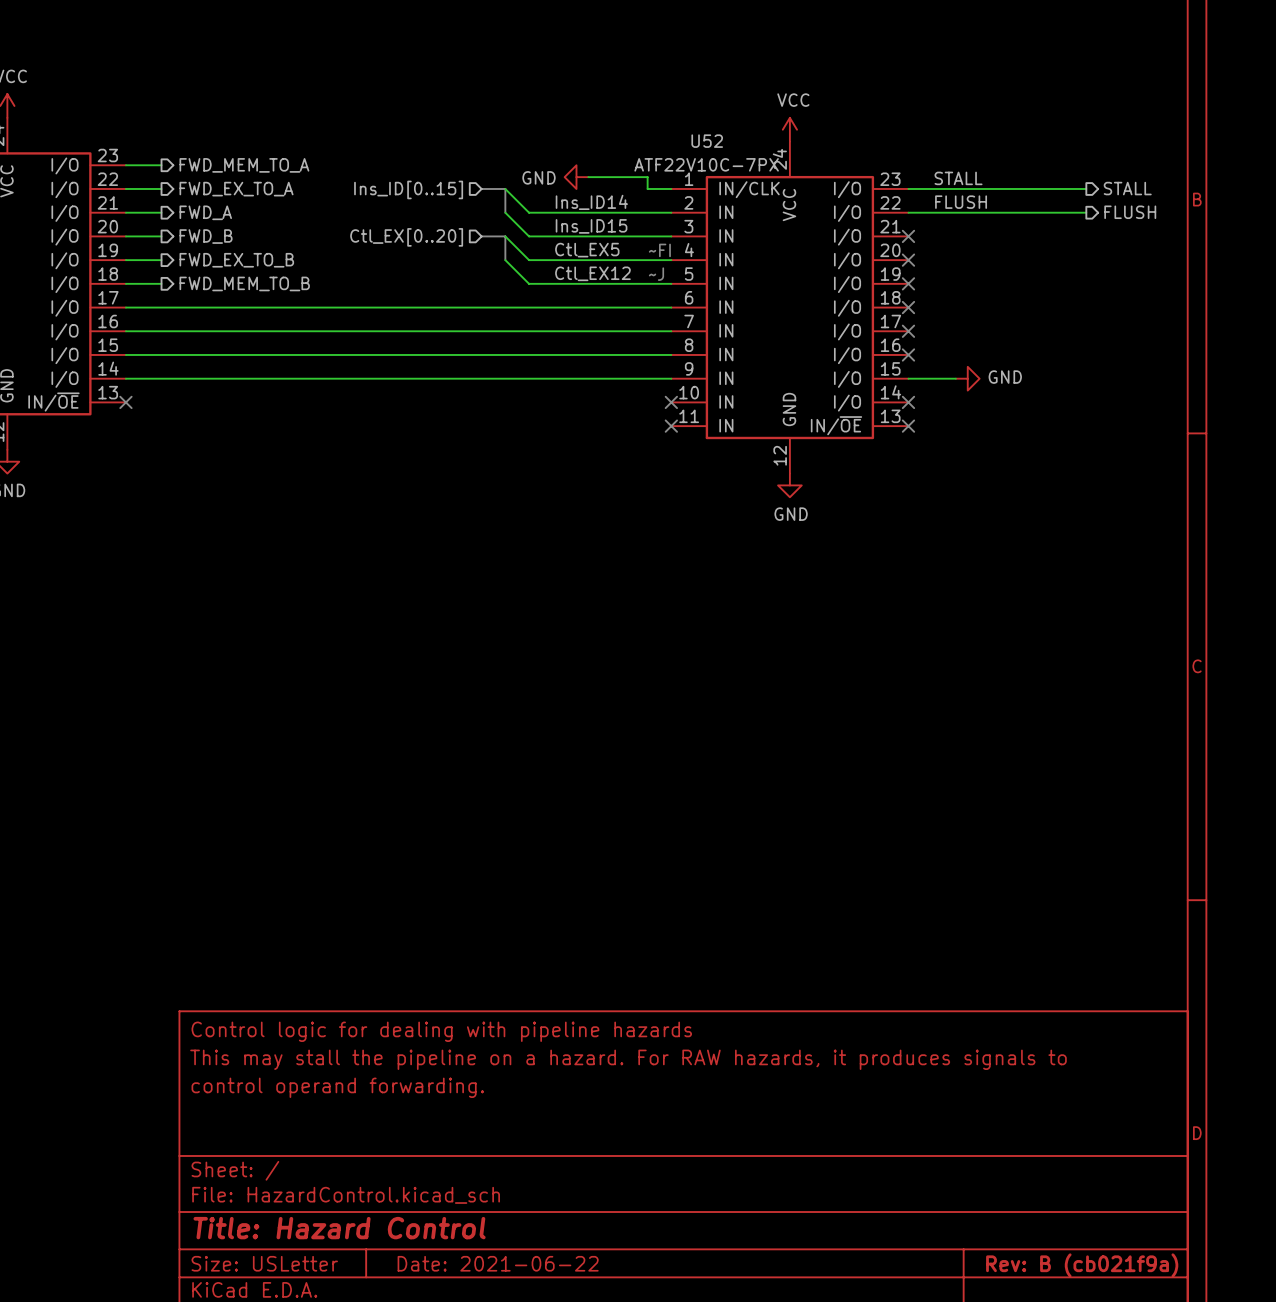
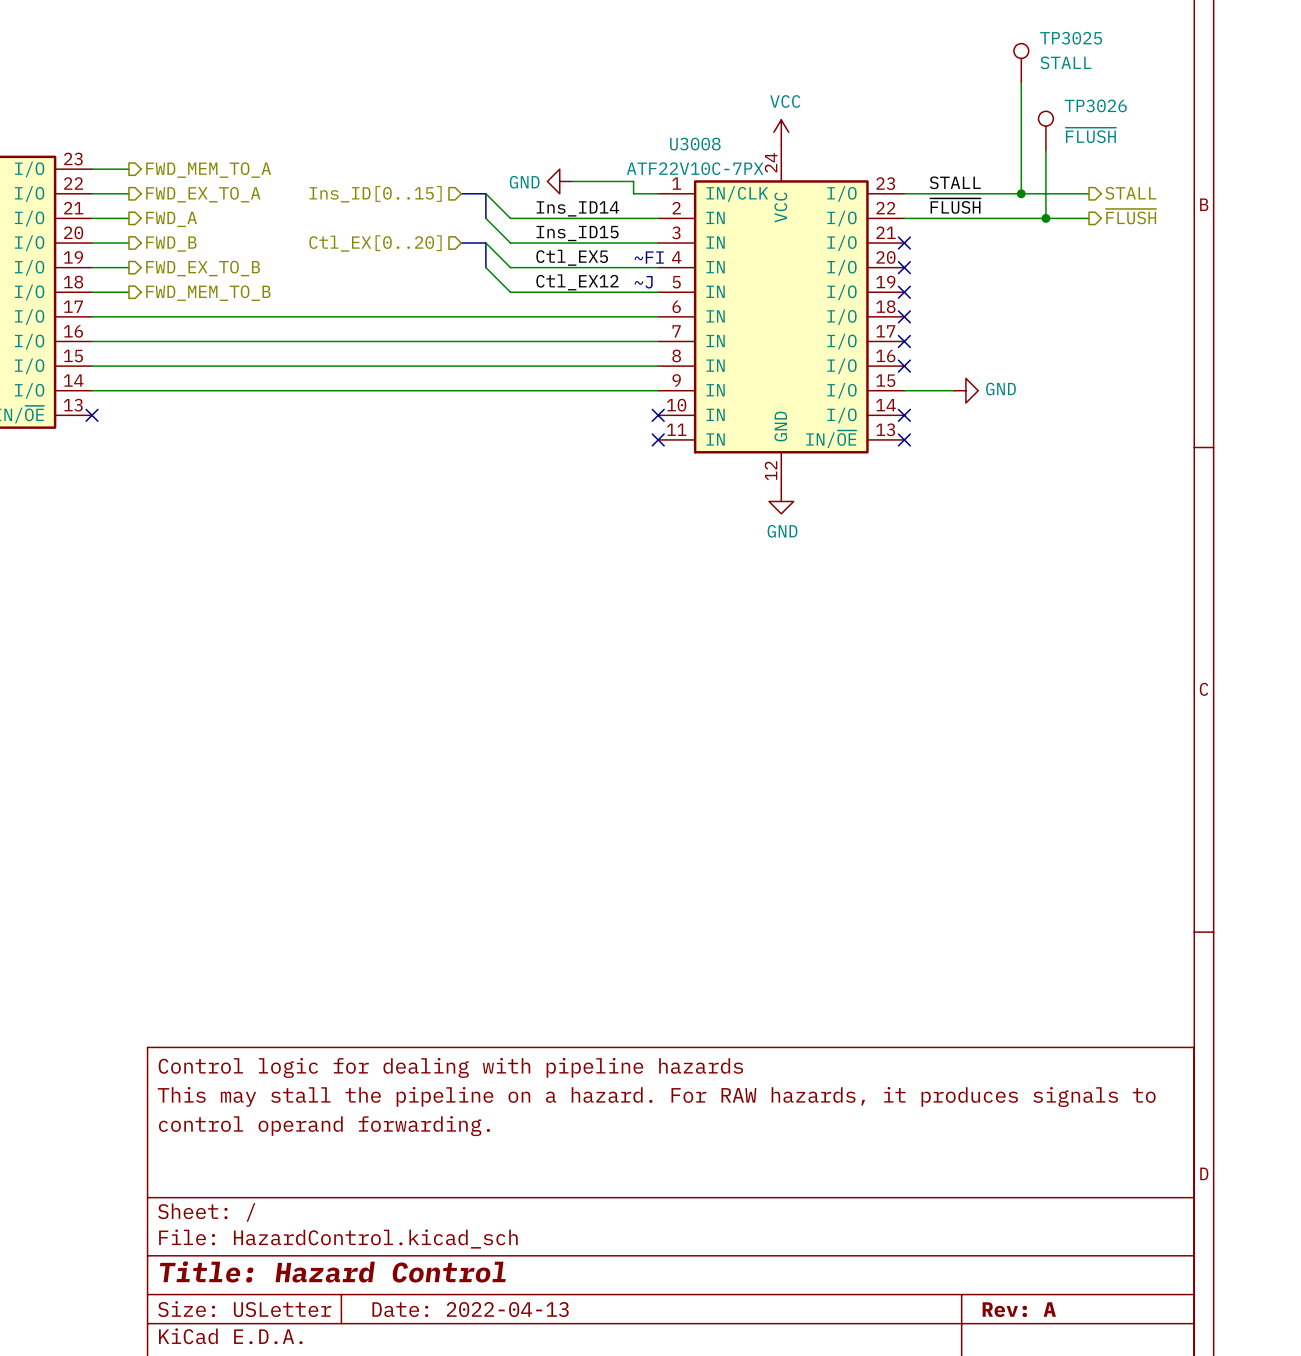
TP3025: none -> STALL (1021, 63)
wire: none -> (1021, 83) (1021, 193)
TP3026: none -> ~{FLUSH} (1045, 131)
U52 name: U52 (707, 141) -> U3008 (695, 144)
wire: none -> (1045, 150) (1045, 218)
junction: none -> (1021, 193)
label: FLUSH (961, 202) -> ~{FLUSH} (955, 206)
junction: none -> (1045, 218)
hierarchical label: FLUSH (1130, 212) -> ~{FLUSH} (1131, 216)
title block: Date: 2021-06-22 (498, 1263) -> Date: 2022-04-13 (470, 1309)
title block: Rev: B (cb021f9a) (1082, 1265) -> Rev: A (1019, 1309)

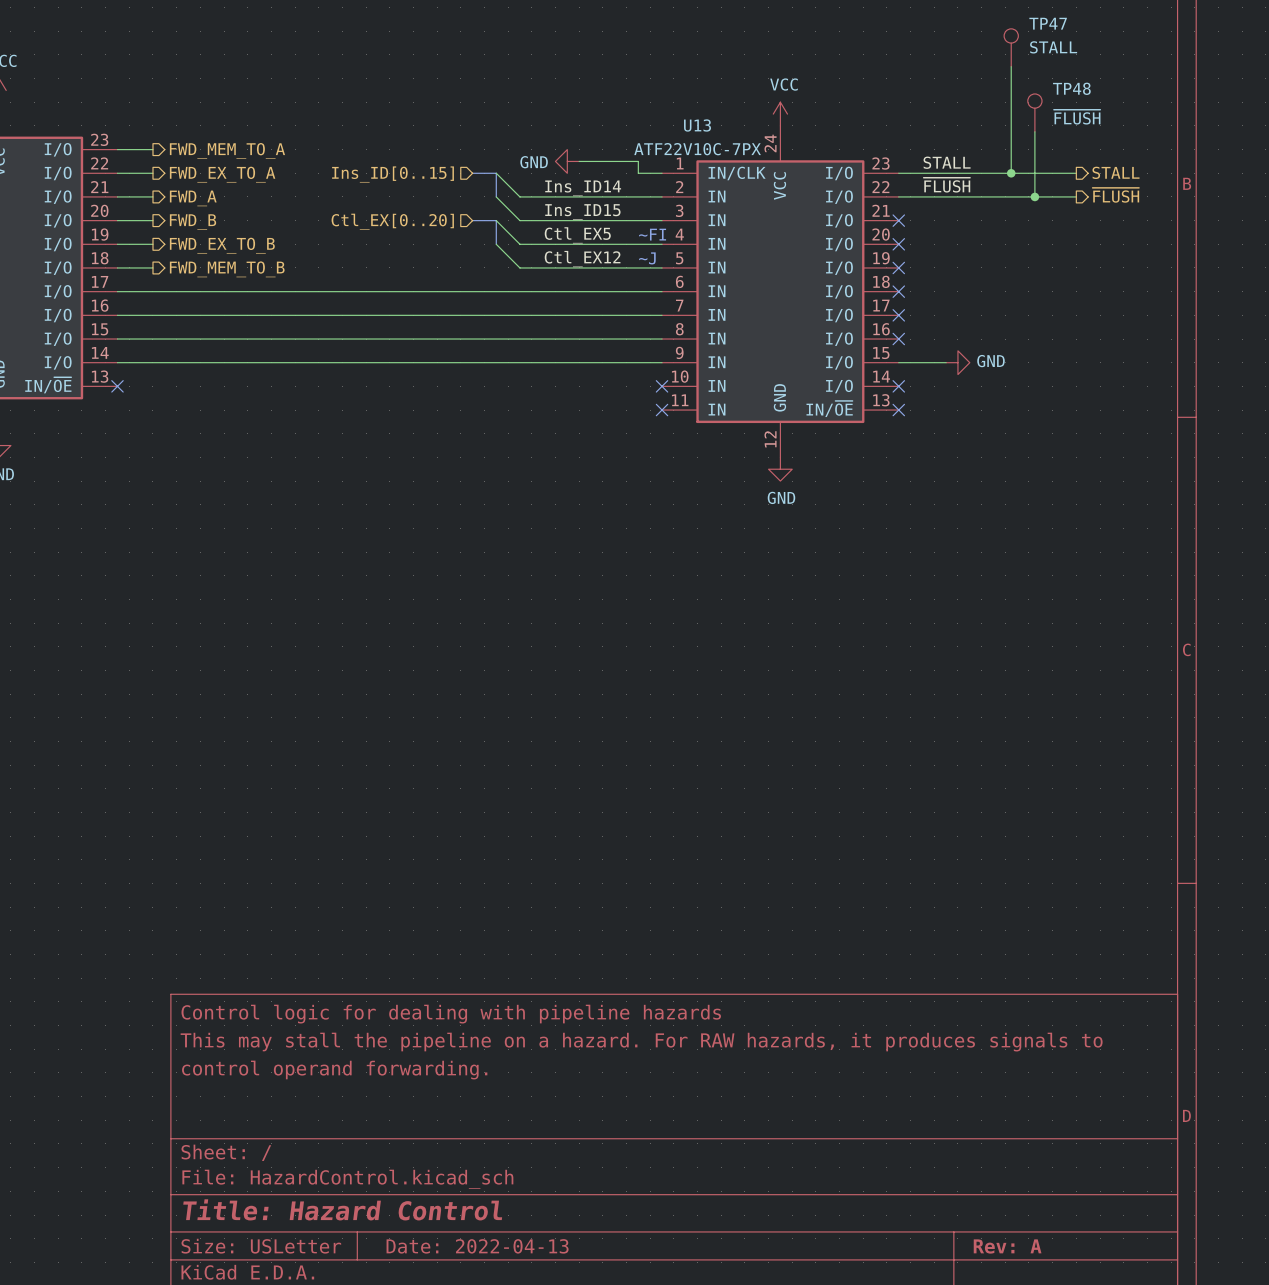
TP3025 name: TP3025 (1071, 38) -> TP47 (1048, 23)
TP3026 name: TP3026 (1095, 105) -> TP48 (1071, 88)
U3008 name: U3008 (695, 144) -> U13 (697, 125)

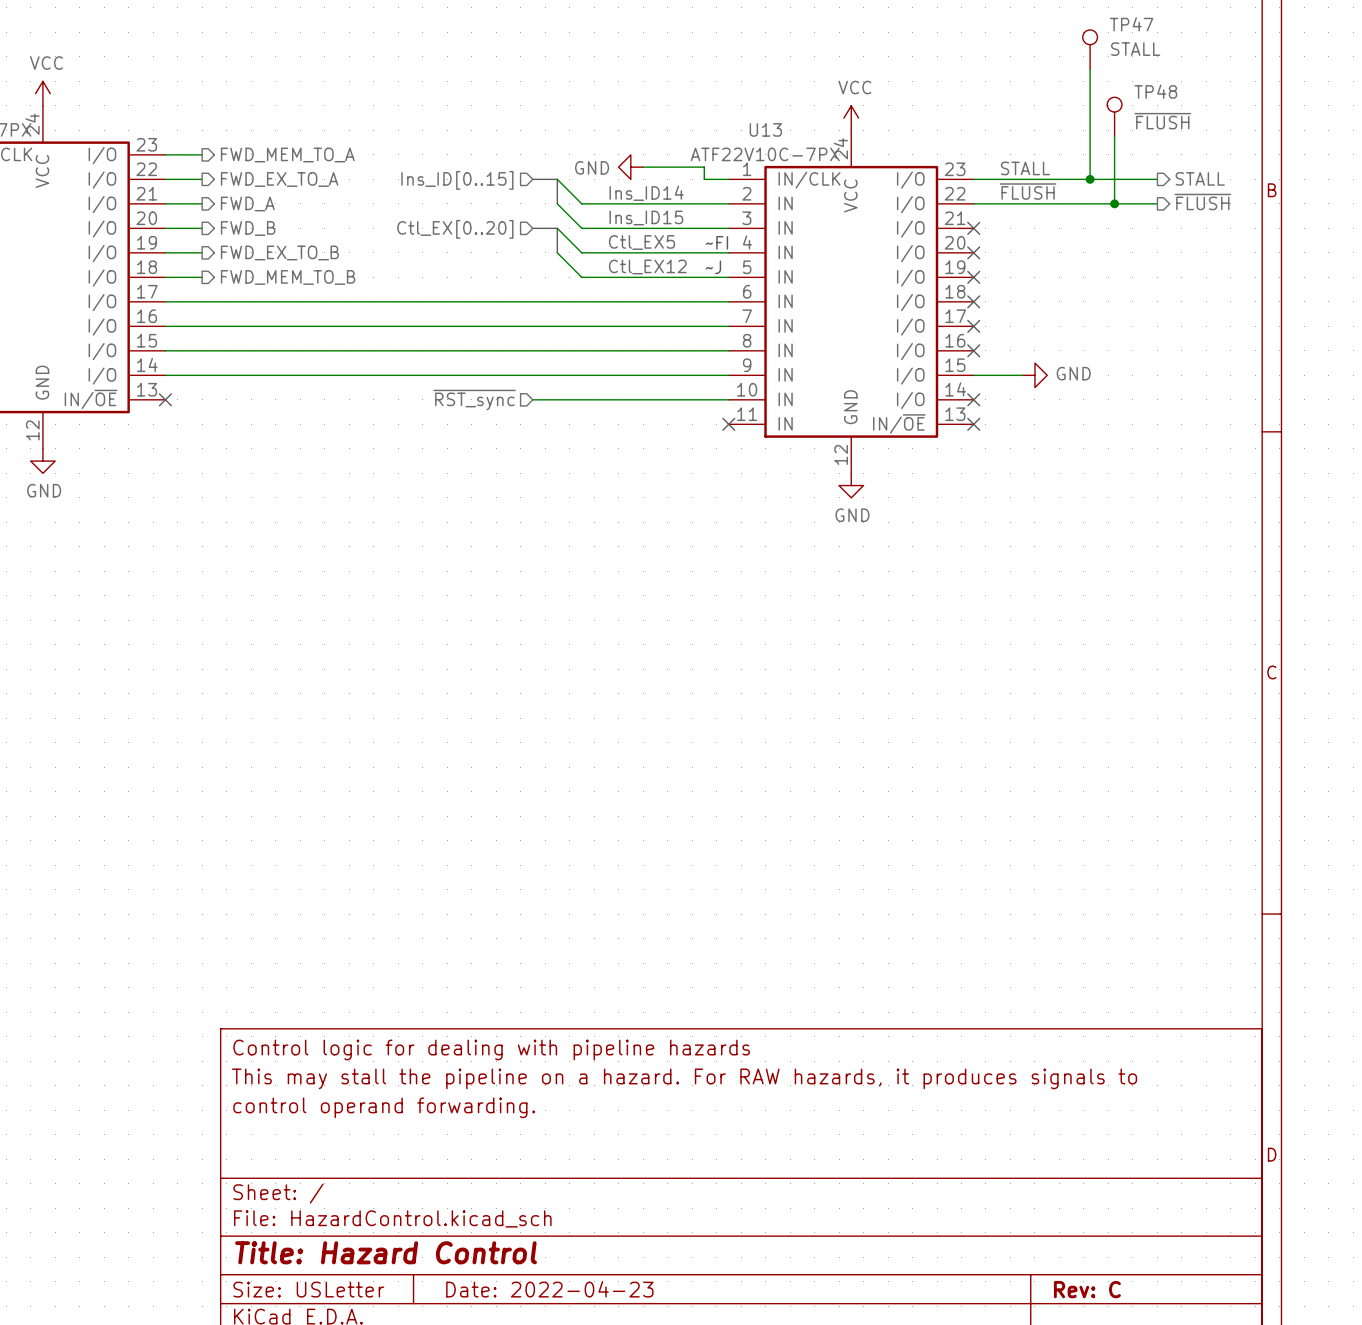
hierarchical label: none -> ~{RST_sync} (474, 400)
wire: none -> (532, 399) (728, 399)
no-connect mark: (662, 386) -> none
title block: Date: 2022-04-13 (477, 1246) -> Date: 2022-04-23 (549, 1289)
title block: Rev: A (1007, 1246) -> Rev: C (1087, 1289)

